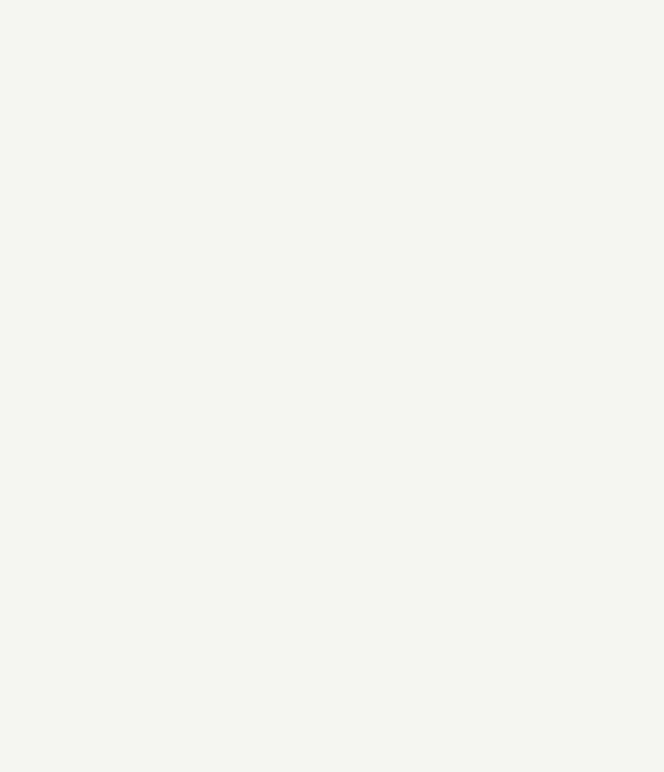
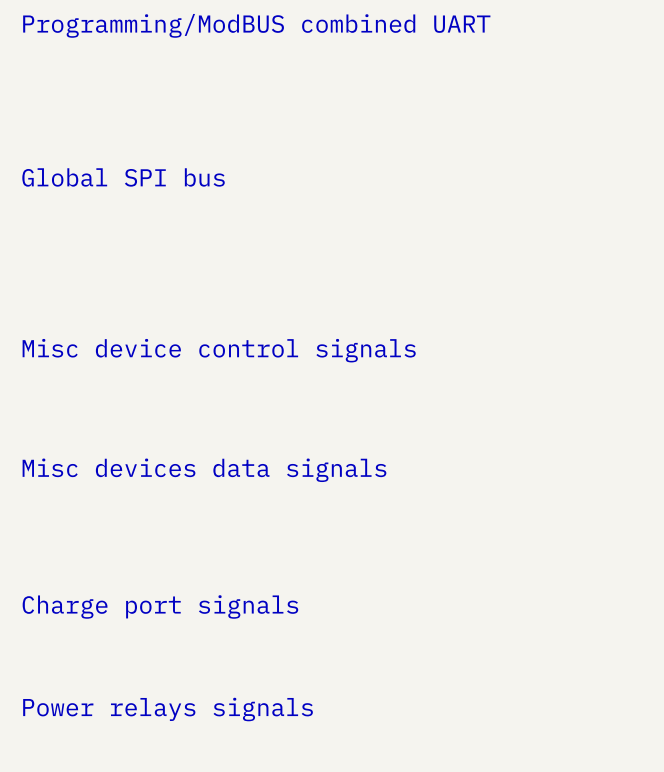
text: none -> Programming/ModBUS combined UART (256, 25)
text: none -> Global SPI bus (123, 177)
text: none -> Misc device control signals (219, 350)
text: none -> Misc devices data signals (204, 470)
text: none -> Charge port signals (160, 606)
text: none -> Power relays signals (168, 709)

